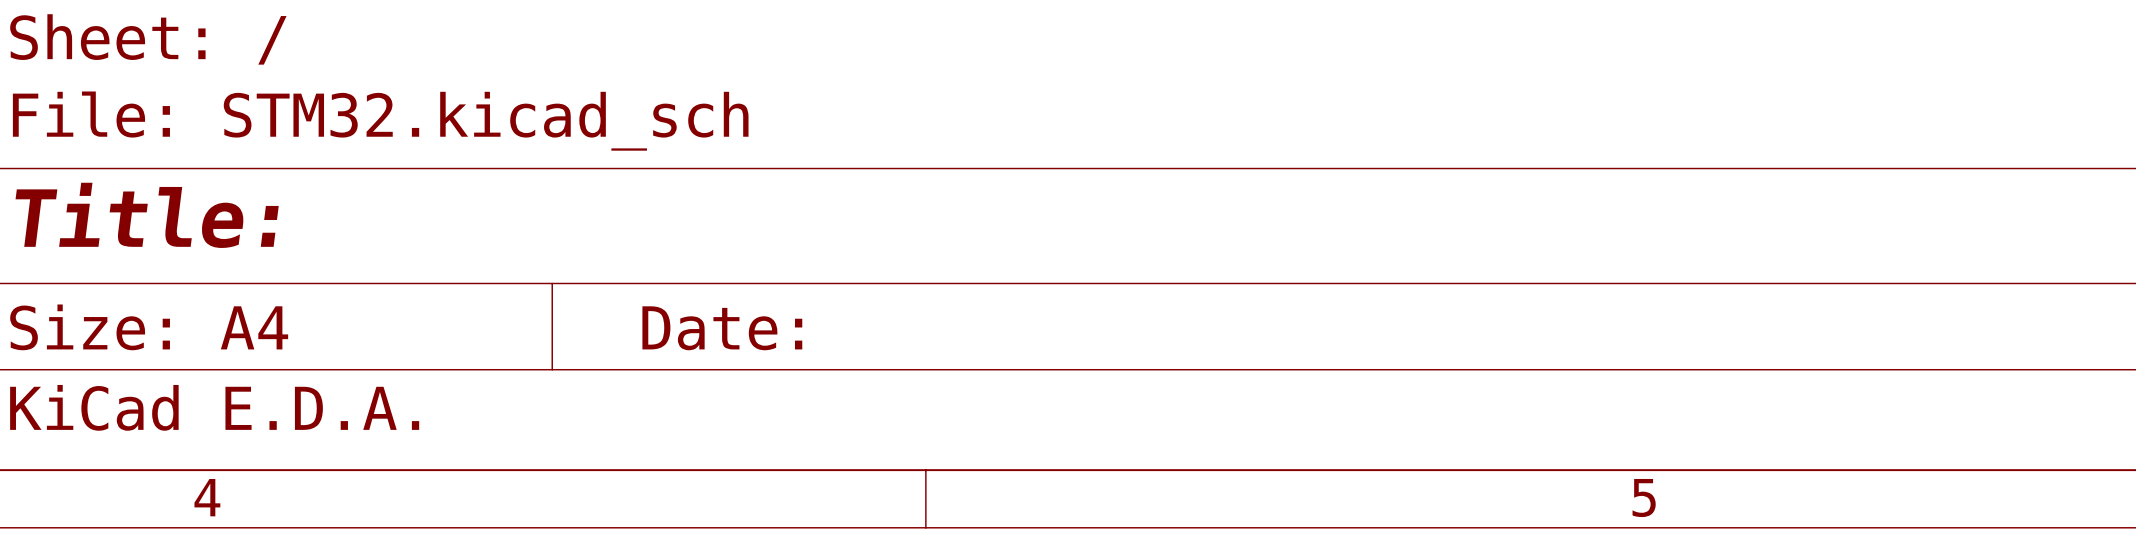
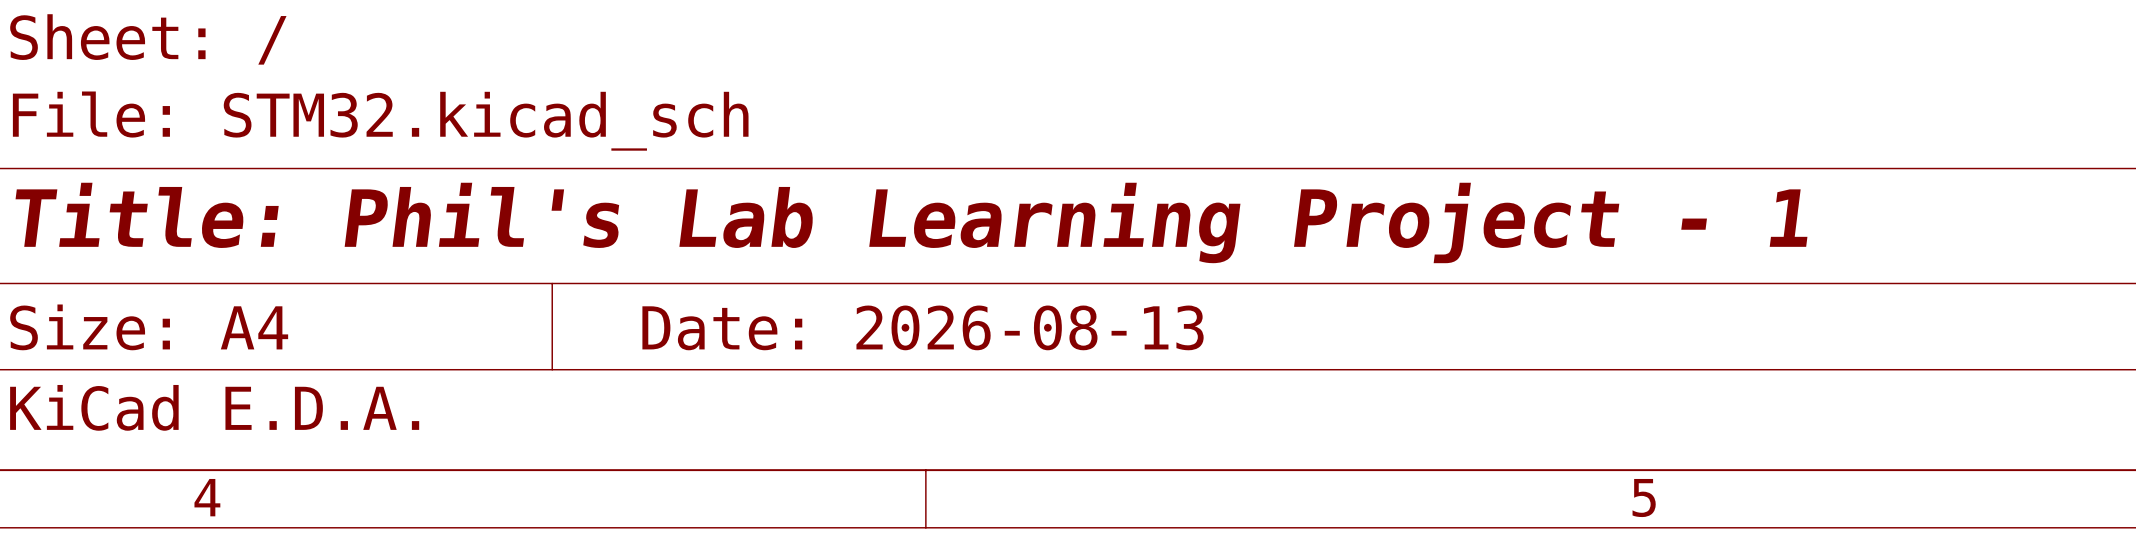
title block: Title: (147, 215) -> Title: Phil's Lab Learning Project - 1 (911, 222)
title block: Date: (722, 328) -> Date: 2026-08-13 (923, 327)

